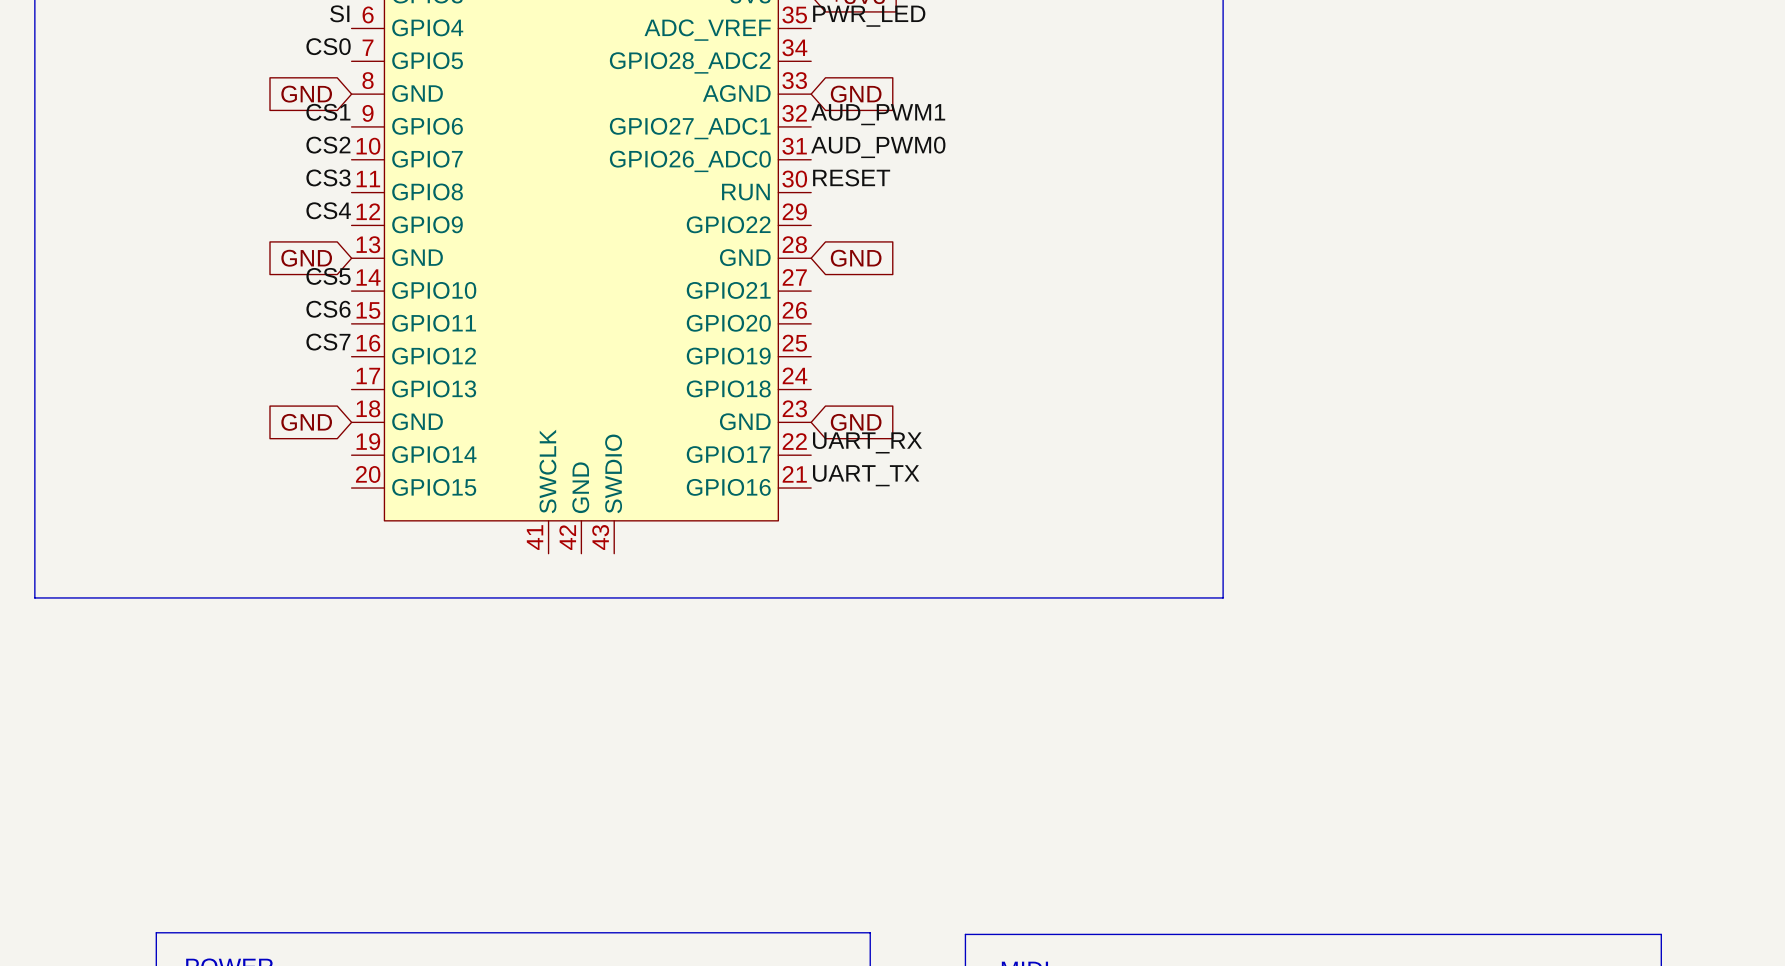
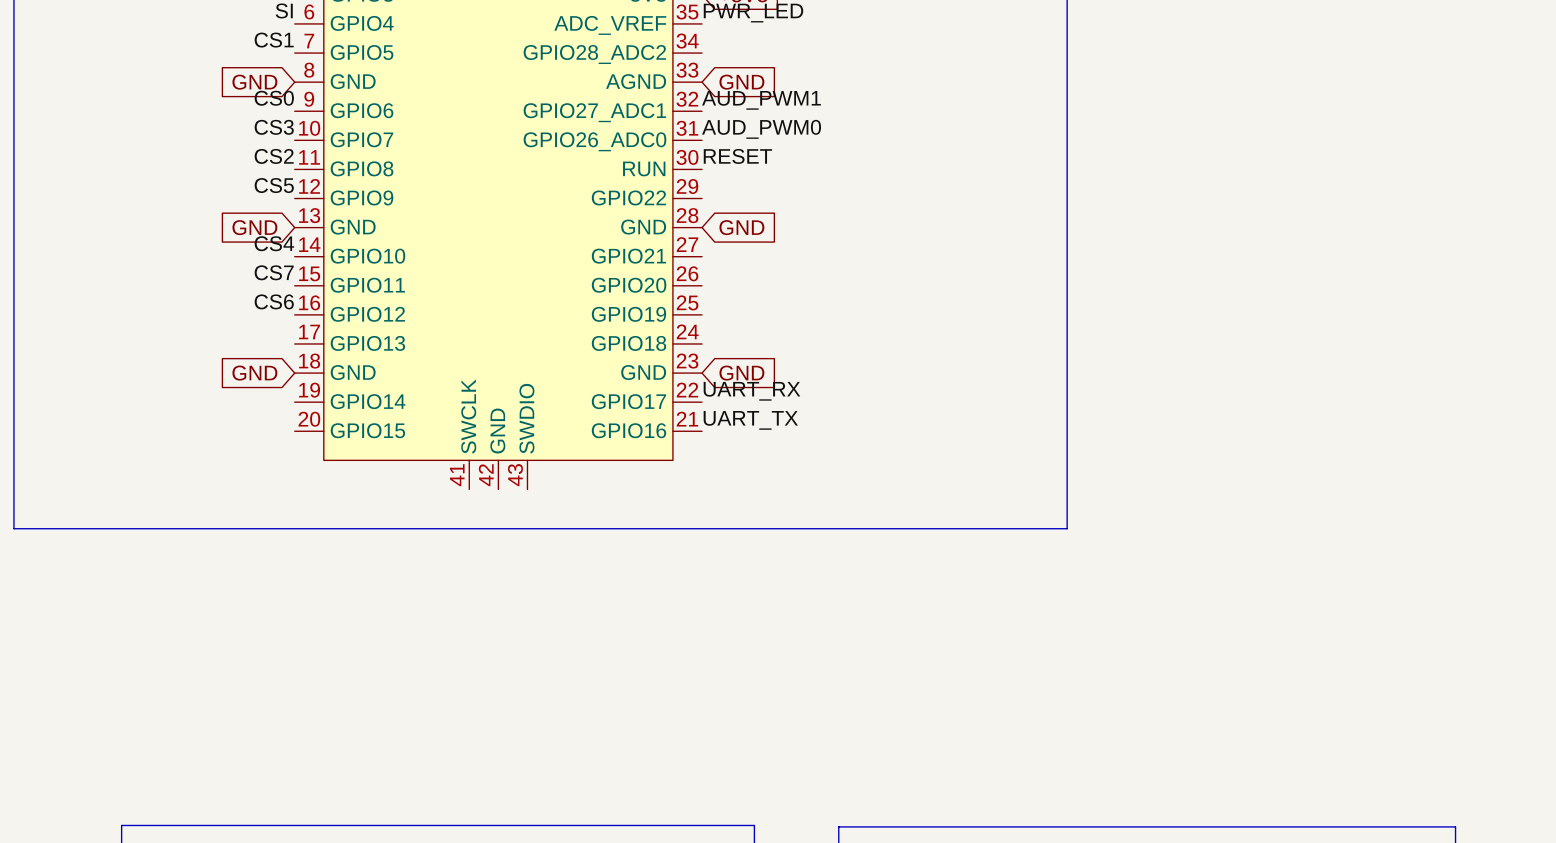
label: CS0 (328, 46) -> CS1 (274, 40)
label: CS1 (328, 112) -> CS0 (274, 98)
label: CS2 (328, 145) -> CS3 (274, 127)
label: CS3 (328, 177) -> CS2 (274, 156)
label: CS4 (328, 210) -> CS5 (274, 185)
label: CS5 (328, 276) -> CS4 (274, 243)
label: CS6 (328, 309) -> CS7 (274, 272)
label: CS7 (328, 342) -> CS6 (274, 301)

